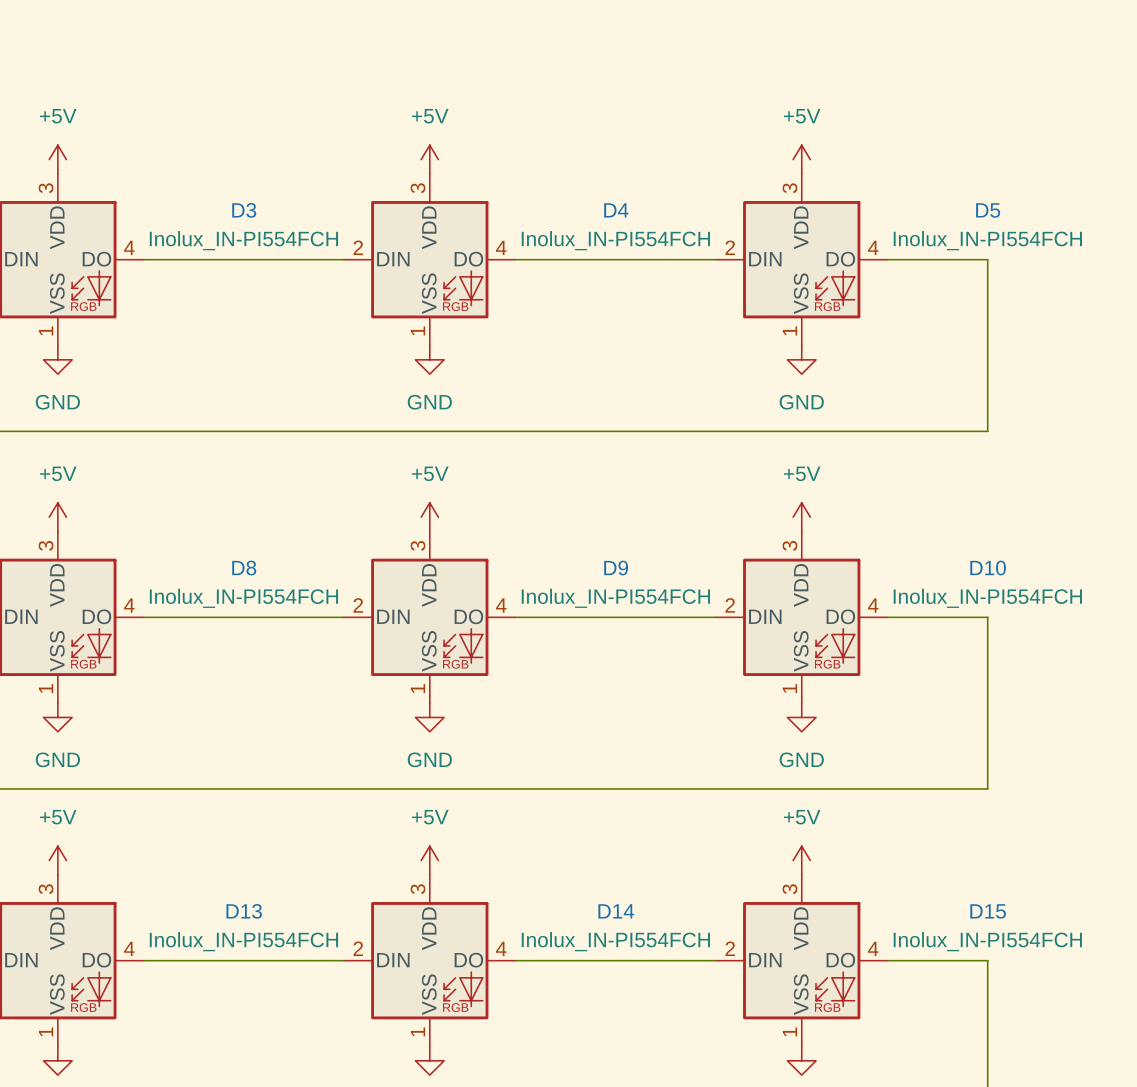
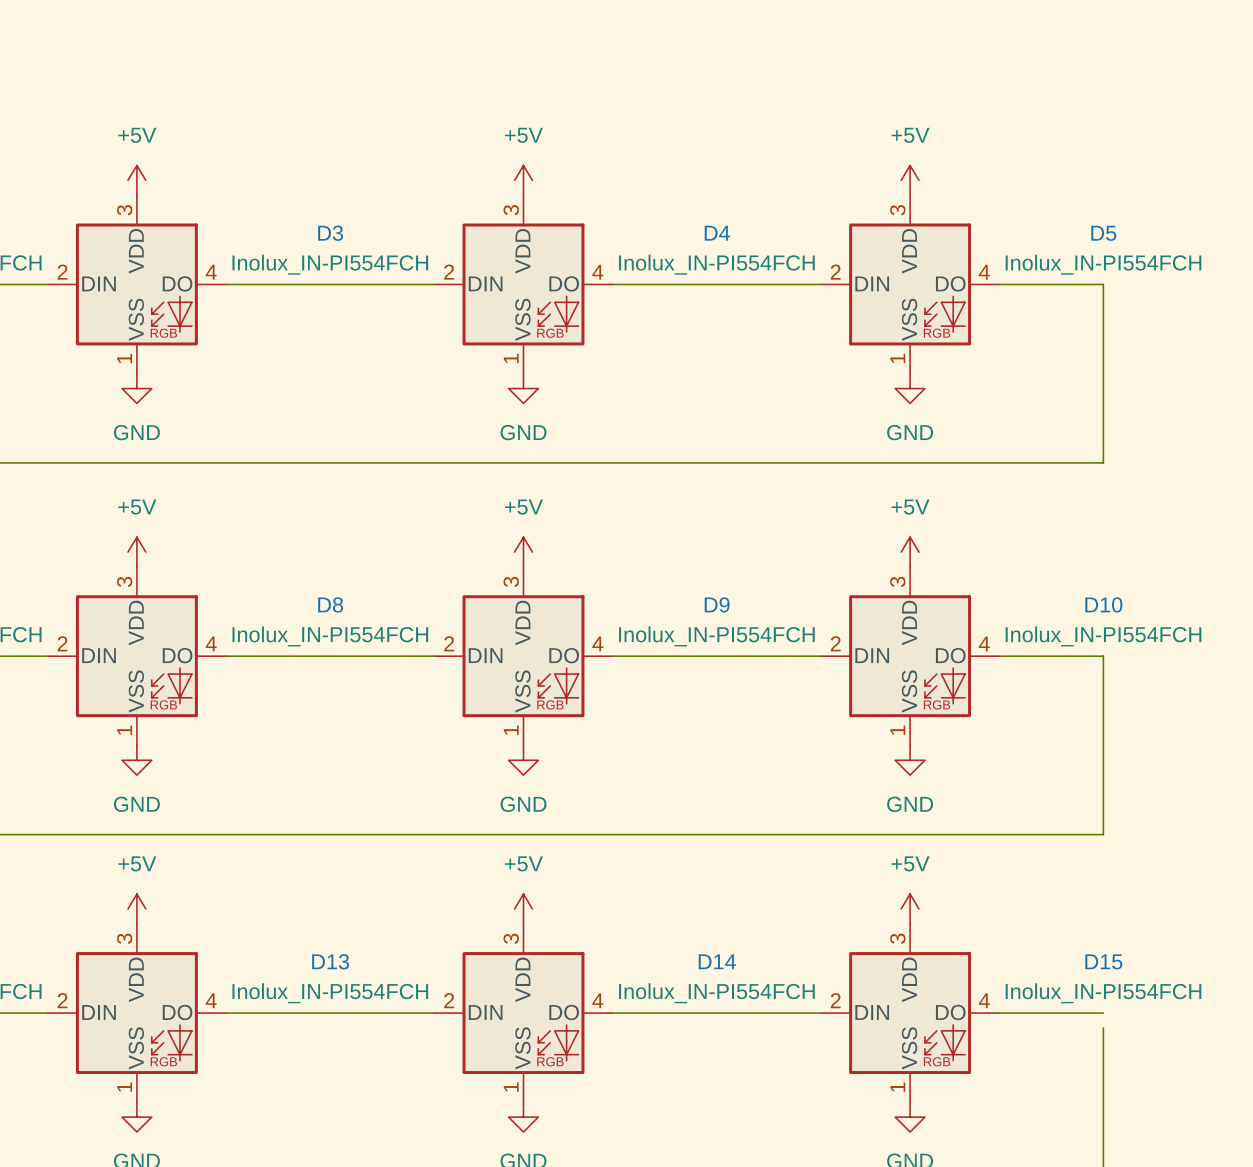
wire: (987, 960) (987, 974) -> none

